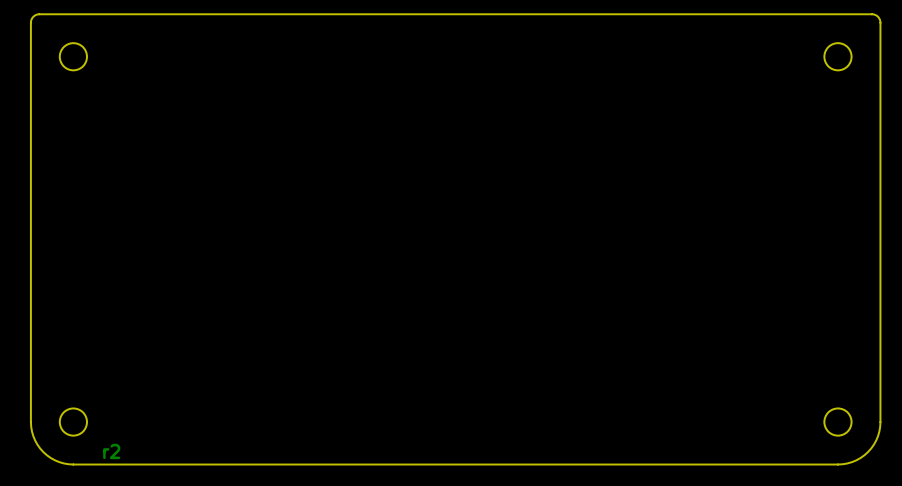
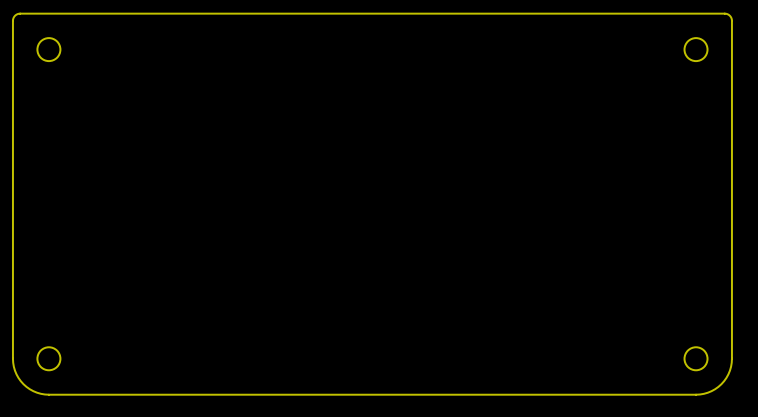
text: r2 (111, 451) -> none

